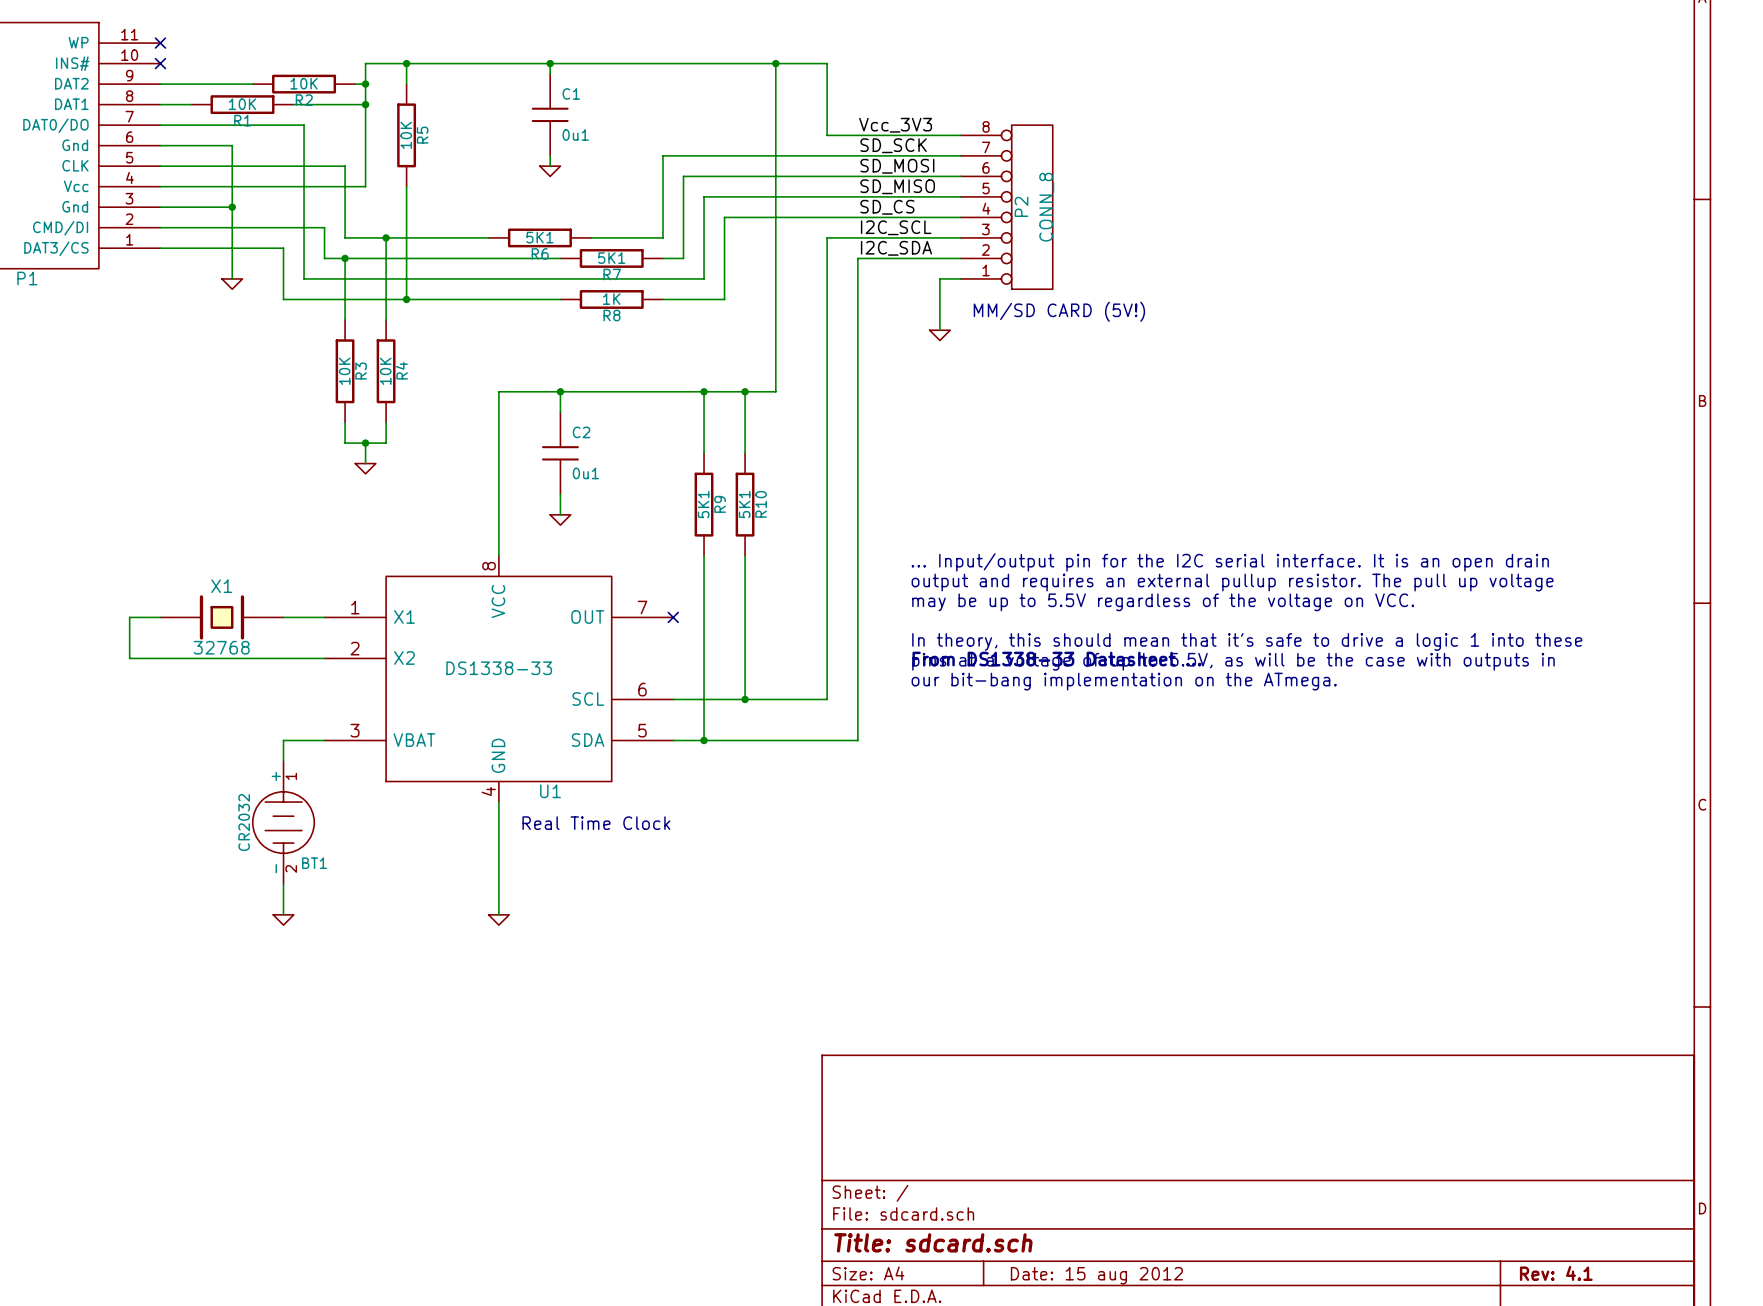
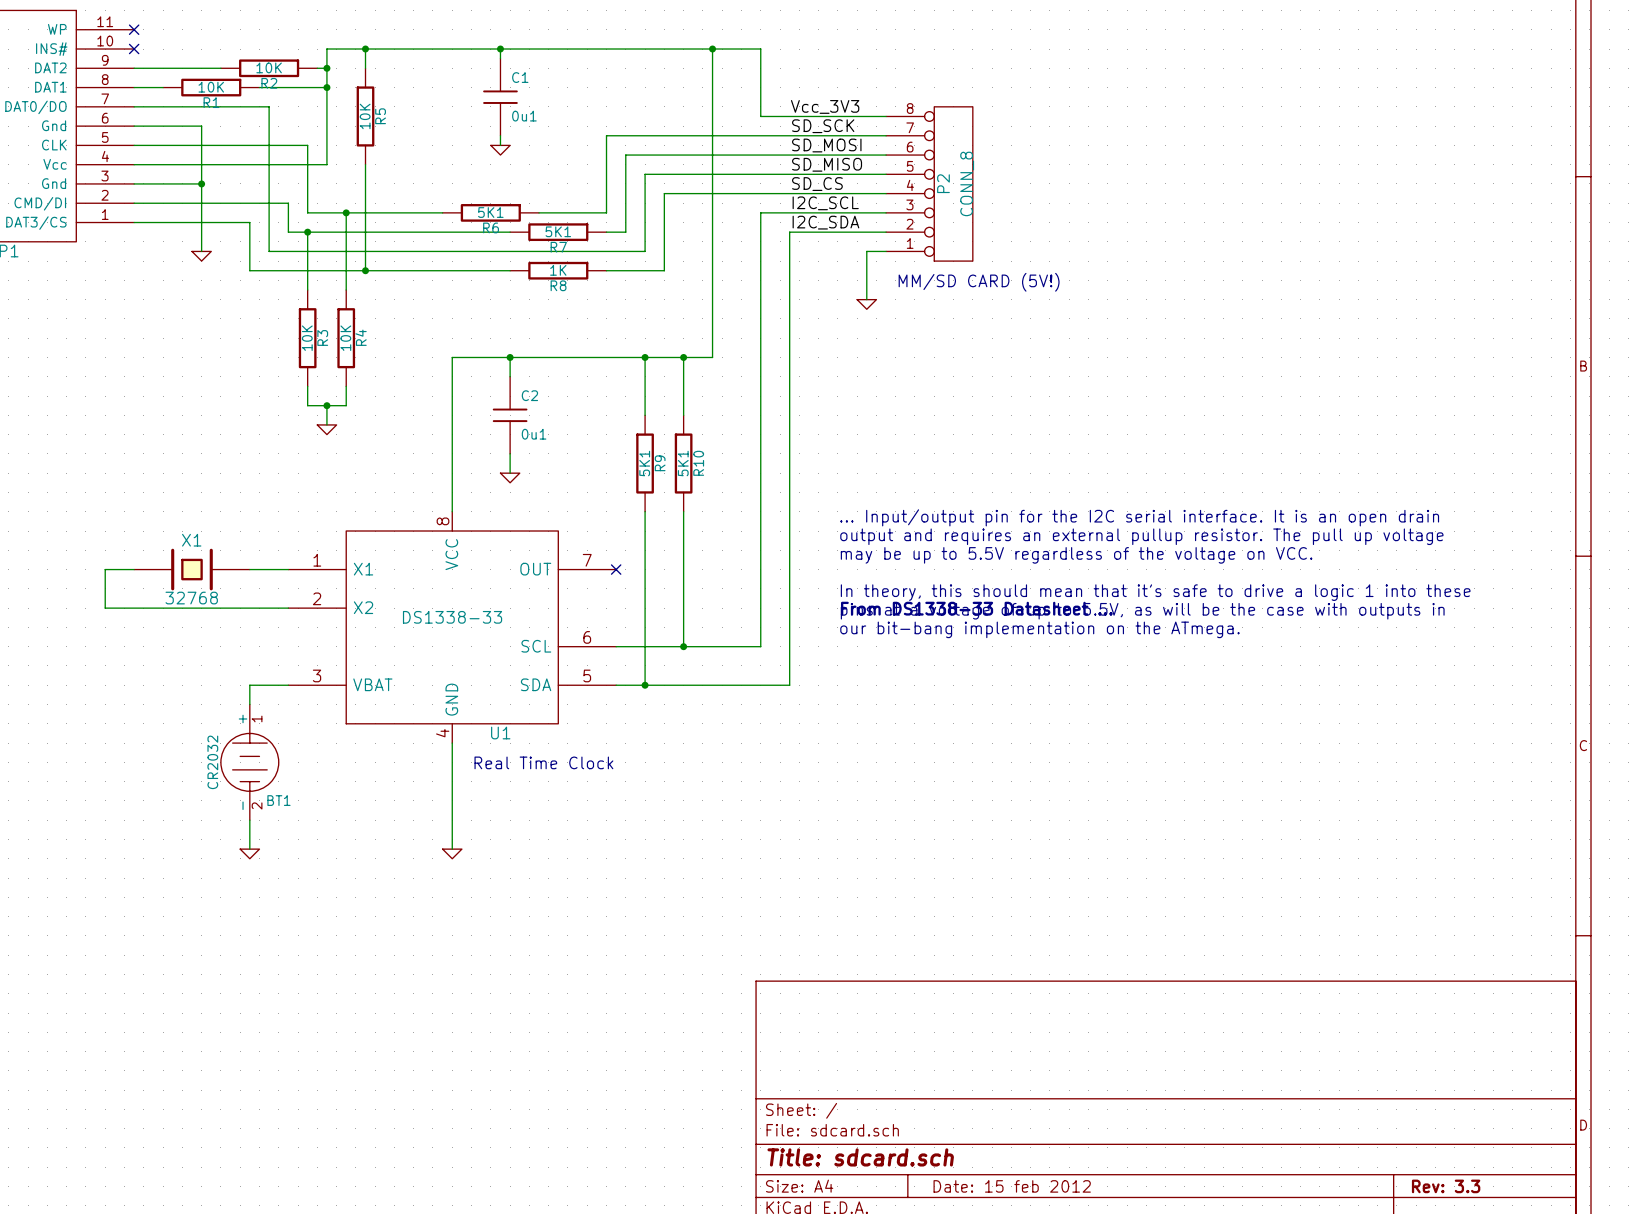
title block: Rev: 4.1 (1556, 1273) -> Rev: 3.3 (1446, 1186)
title block: Date: 15 aug 2012 (1096, 1275) -> Date: 15 feb 2012 (1012, 1186)

